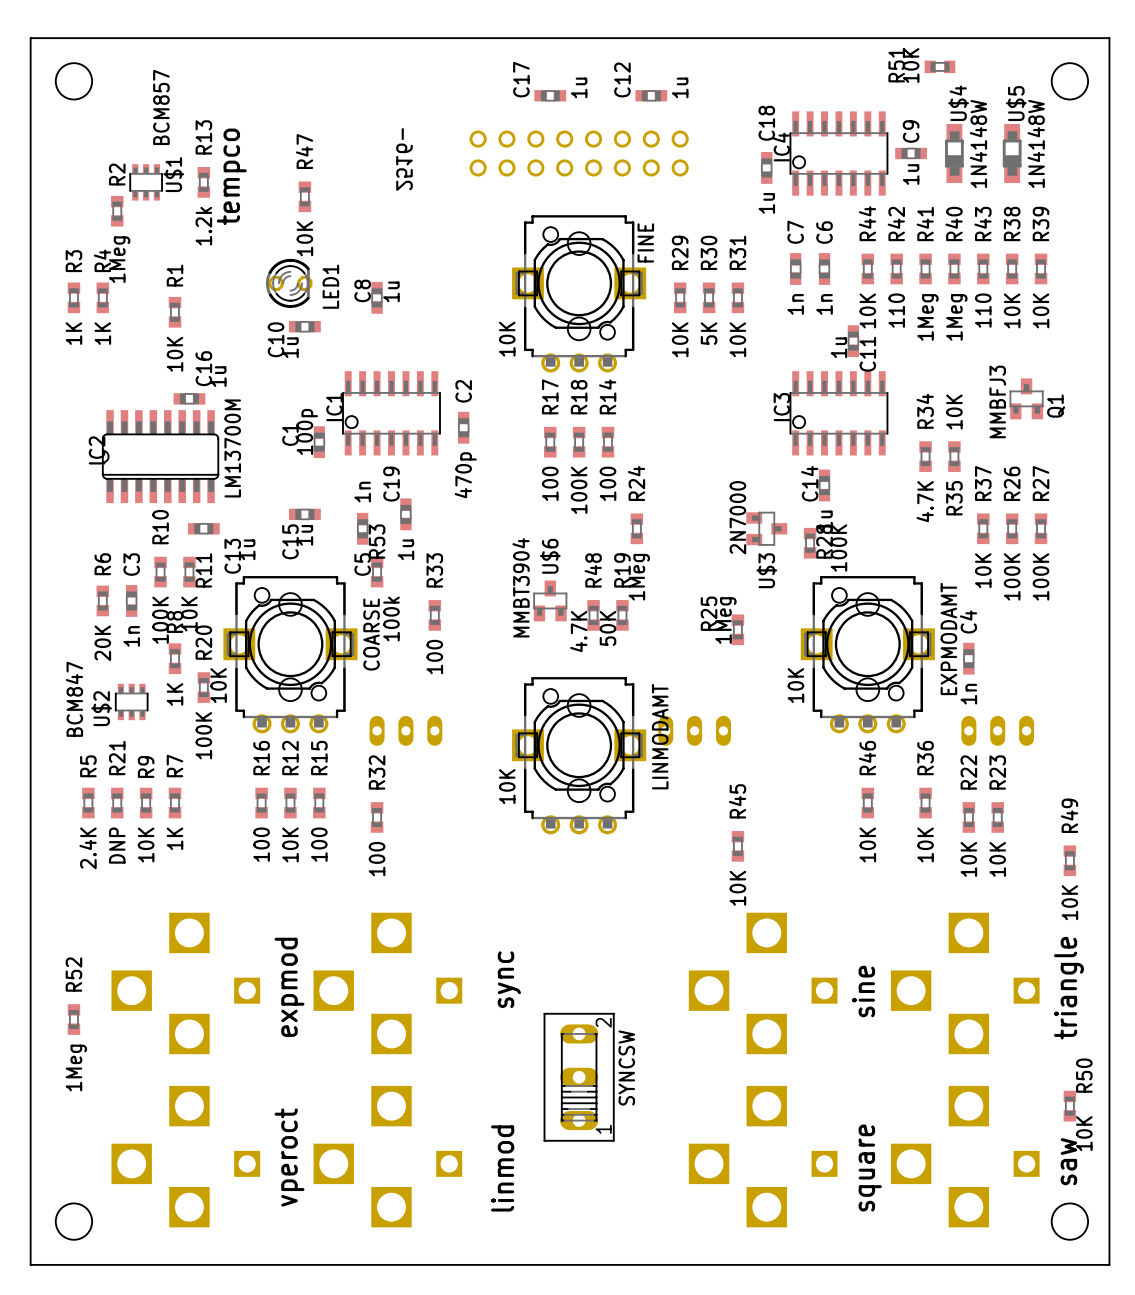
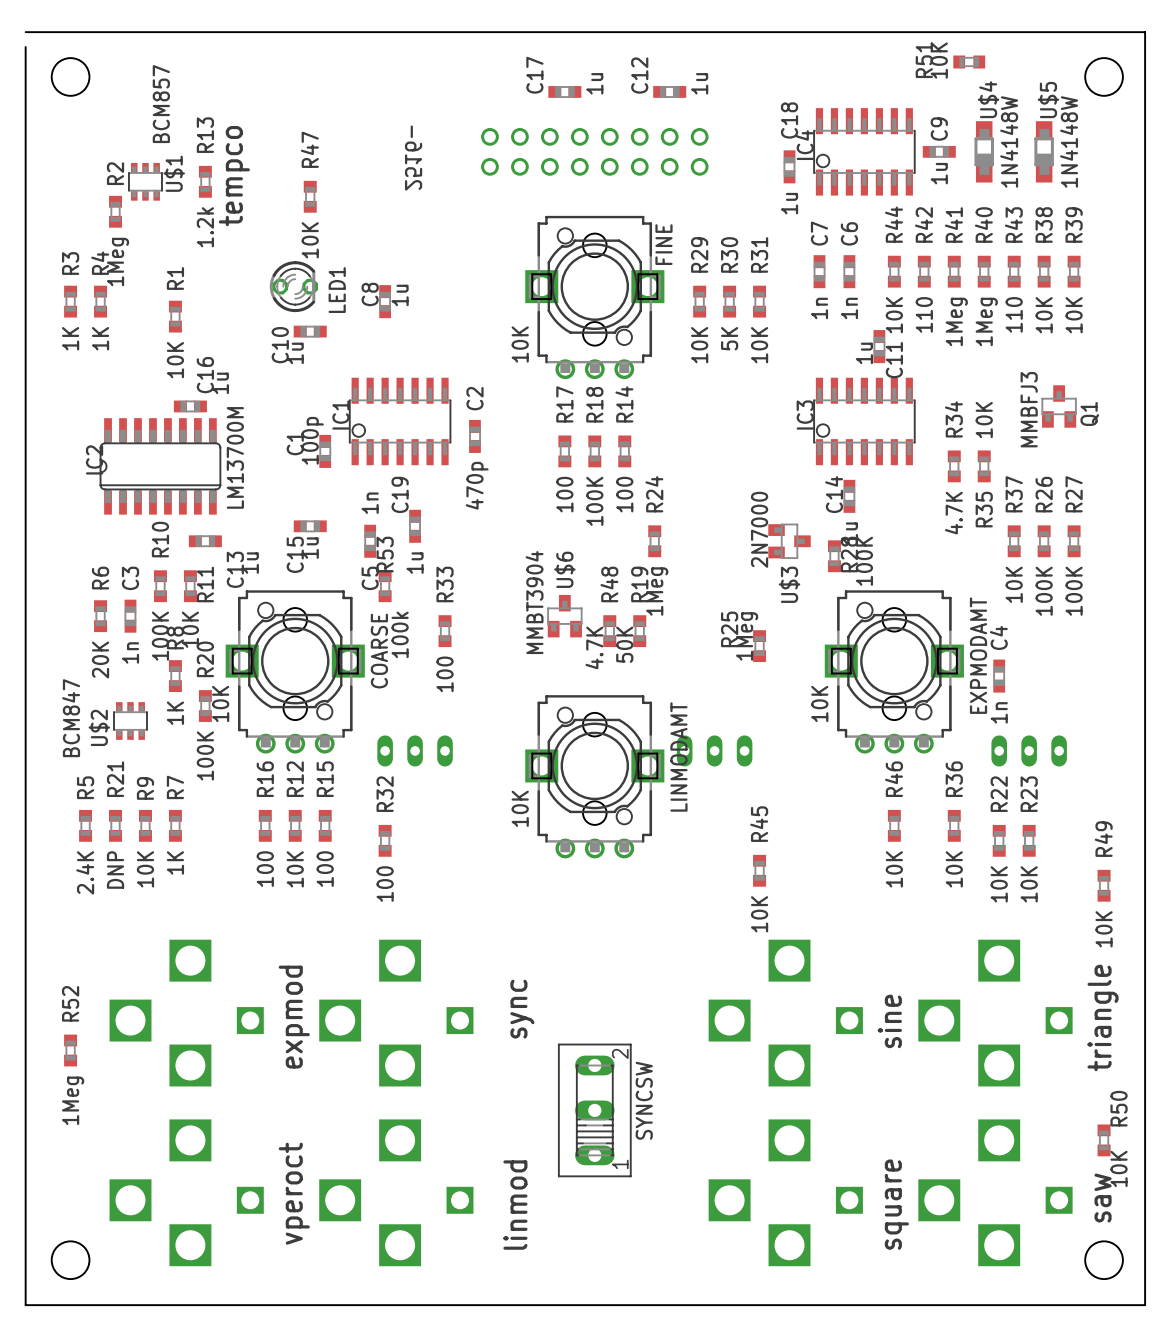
board edge: (30, 38) (30, 52) -> none

